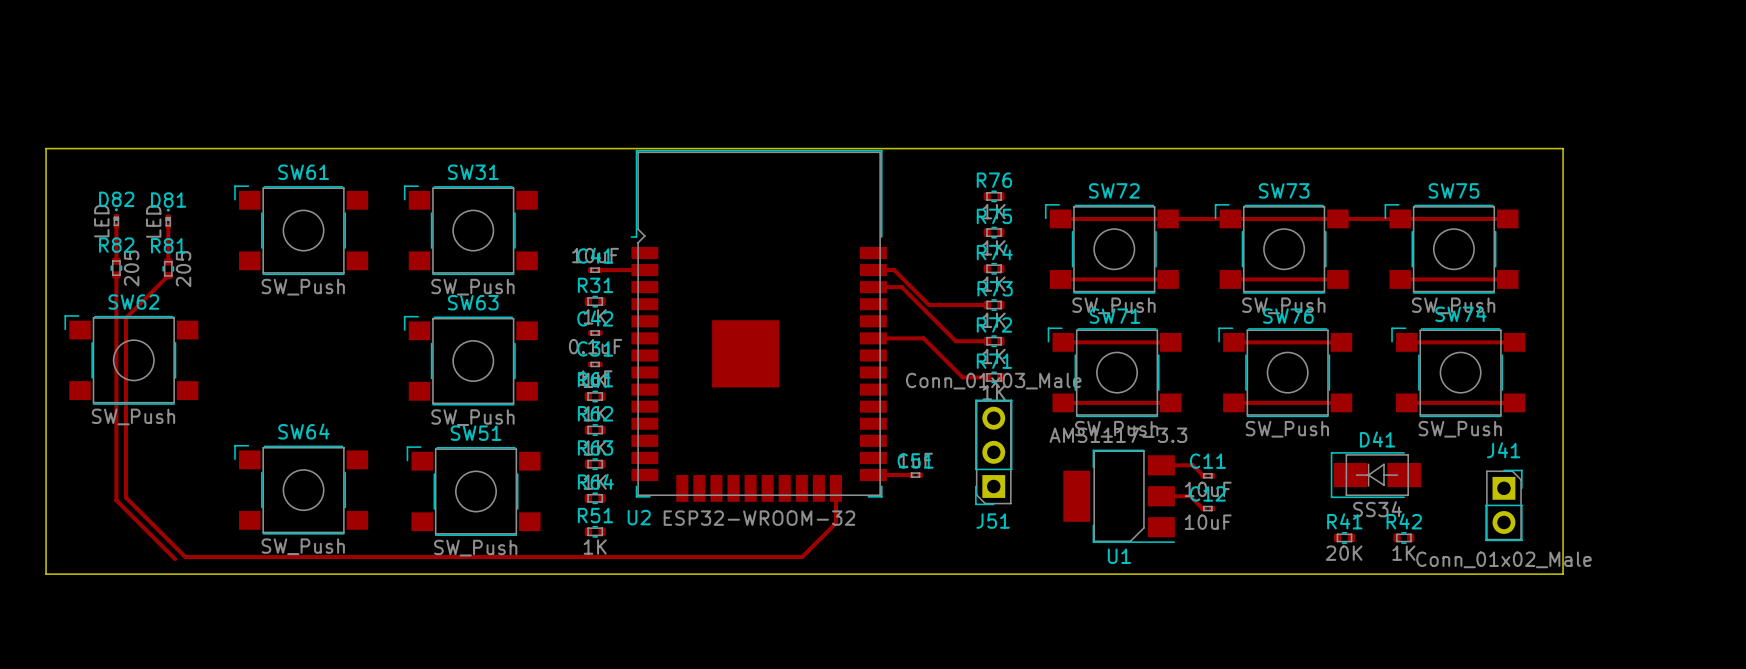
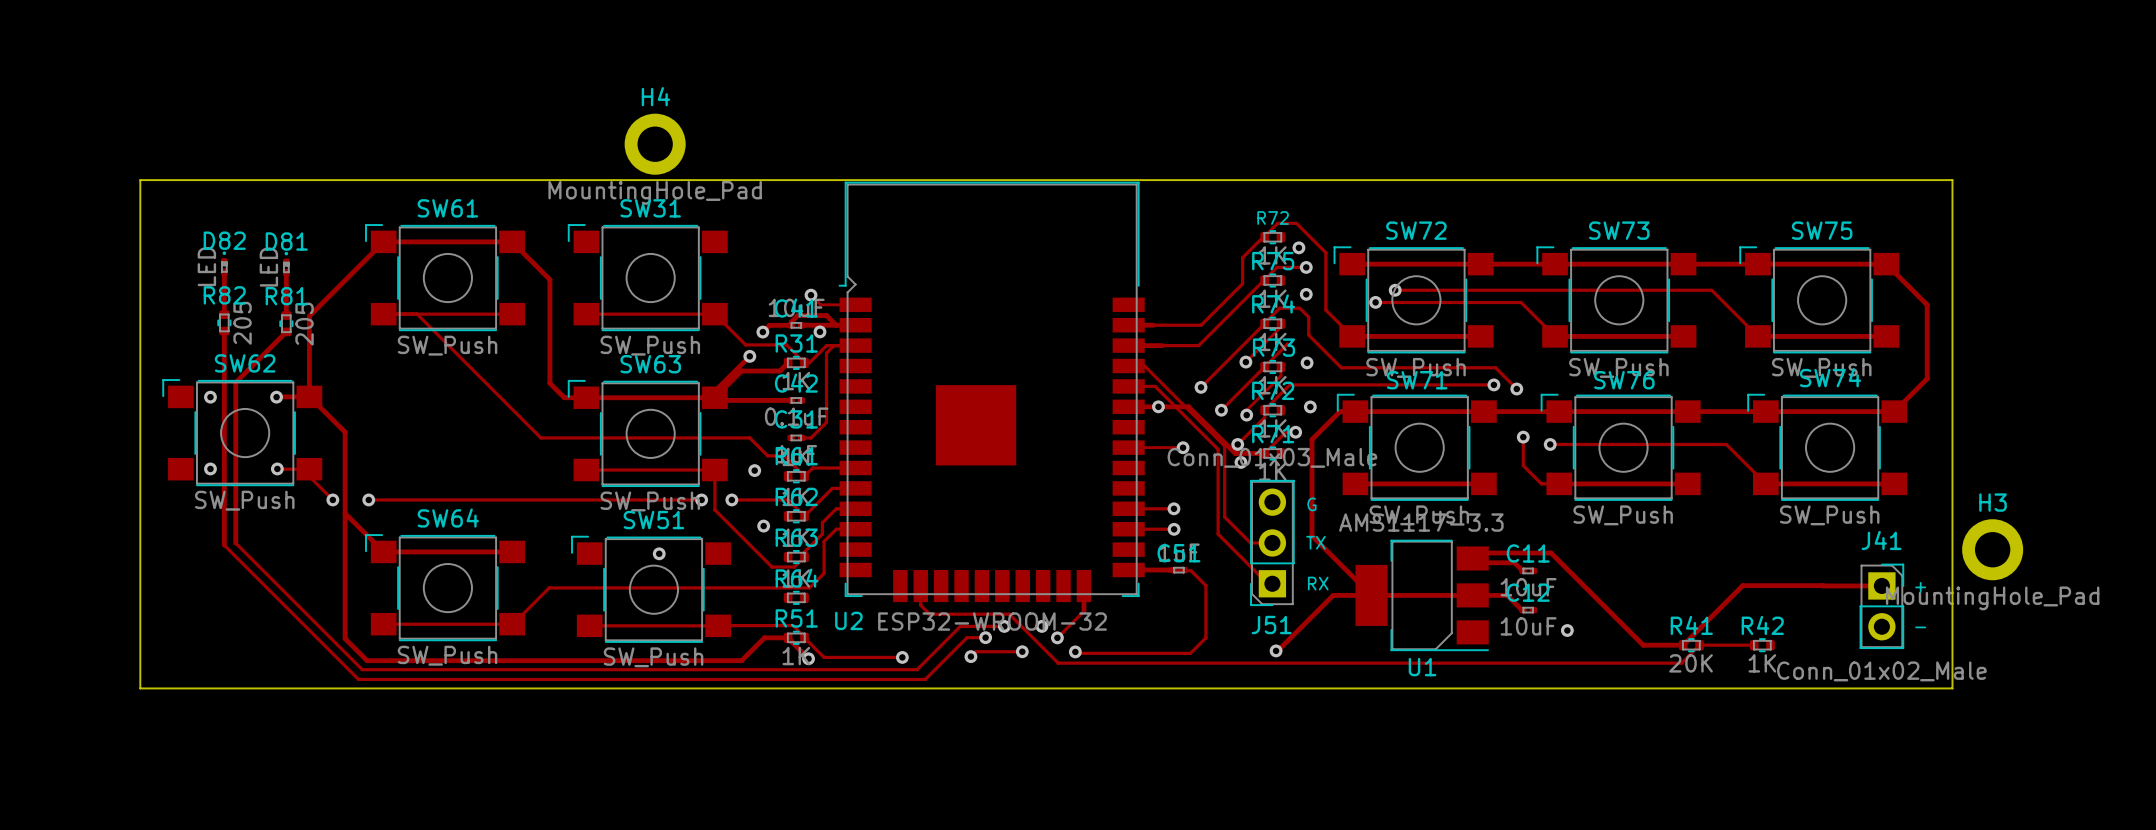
H4: none -> MountingHole_Pad (655, 144)
R76 name: R76 (994, 180) -> R72 (1273, 217)
via: none -> (1298, 247)
track: none -> (1886, 264) (1927, 304) (1927, 378) (1894, 411)
via: none -> (1306, 267)
track: none -> (1395, 290) (1711, 290) (1757, 336)
via: none -> (1395, 290)
track: none -> (810, 295) (820, 304) (855, 304)
via: none -> (810, 295)
via: none -> (1306, 294)
via: none -> (1375, 302)
track: none -> (1375, 302) (1521, 302) (1555, 336)
track: none -> (383, 314) (512, 314)
track: none -> (417, 314) (540, 437) (749, 437) (767, 455) (784, 455) (804, 476) (812, 468) (855, 468)
track: none -> (586, 314) (714, 314) (745, 344) (786, 344) (804, 362) (809, 362) (826, 345) (855, 345)
track: none -> (1264, 323) (1279, 308) (1299, 308) (1308, 317) (1308, 335) (1341, 367) (1495, 367) (1516, 388)
track: none -> (1264, 323) (1201, 387)
track: none -> (1281, 323) (1281, 326) (1245, 362)
track: none -> (836, 325) (826, 315) (797, 315) (791, 322) (791, 325) (769, 325) (762, 332)
track: (894, 270) (929, 305) (987, 305) -> (1153, 325) (1201, 325) (1242, 283) (1242, 257) (1277, 223) (1296, 223) (1325, 252) (1325, 310) (1352, 336)
via: none -> (762, 332)
via: none -> (819, 331)
track: none -> (1287, 344) (1221, 410)
track: none -> (833, 345) (826, 353) (826, 422) (810, 437) (801, 437)
track: (901, 287) (955, 341) (987, 341) -> (1162, 345) (1198, 345) (1276, 267) (1306, 267)
track: none -> (749, 356) (714, 391) (714, 397)
via: none -> (749, 356)
via: none -> (1245, 362)
track: none -> (788, 362) (779, 371) (741, 371) (714, 397)
via: none -> (1307, 362)
track: none -> (1141, 366) (1144, 366) (1224, 446) (1224, 517) (1250, 542) (1272, 542)
track: none -> (1281, 366) (1281, 375) (1246, 410) (1246, 415)
track: none -> (1493, 384) (1289, 384) (1264, 410) (1264, 417) (1237, 444)
via: none -> (1493, 384)
track: none -> (1128, 386) (1155, 386) (1218, 449) (1218, 534) (1267, 583) (1272, 583)
via: none -> (1201, 387)
via: none -> (1516, 388)
via: none -> (210, 397)
track: none -> (276, 397) (309, 396) (345, 432) (345, 638) (367, 660) (741, 660) (764, 637) (788, 637) (808, 658)
via: none -> (276, 397)
track: none -> (309, 396) (309, 316) (383, 241) (512, 241) (549, 279) (549, 383) (564, 397) (714, 397)
track: none -> (714, 397) (717, 400) (791, 400)
via: none -> (1158, 406)
via: none -> (1310, 406)
via: none -> (1221, 410)
track: none -> (1355, 411) (1339, 411) (1311, 439) (1311, 535) (1371, 595)
track: none -> (1483, 411) (1559, 411)
track: none -> (1687, 411) (1765, 411)
via: none -> (1246, 415)
track: none -> (1295, 432) (1285, 432) (1264, 453)
via: none -> (1295, 432)
track: none -> (1523, 437) (1523, 465) (1541, 483) (1559, 483)
via: none -> (1523, 437)
via: none -> (1237, 444)
track: none -> (1550, 444) (1726, 444) (1765, 483)
via: none -> (1550, 444)
track: none -> (1128, 447) (1182, 447)
via: none -> (1183, 447)
via: none -> (1240, 462)
via: none -> (210, 468)
track: none -> (277, 468) (309, 469) (309, 476) (332, 499)
via: none -> (277, 468)
track: none -> (586, 470) (714, 470) (714, 509) (772, 567) (794, 567) (804, 557) (804, 551) (822, 534) (822, 522) (836, 508) (855, 508)
via: none -> (754, 470)
track: none -> (855, 488) (832, 488) (804, 516) (788, 499) (731, 499)
via: none -> (332, 499)
track: none -> (368, 499) (701, 499)
via: none -> (368, 499)
via: none -> (701, 499)
via: none -> (731, 499)
text: none -> G (1311, 504)
track: none -> (1128, 508) (1173, 508)
via: none -> (1173, 508)
track: none -> (345, 513) (383, 551) (512, 551)
via: none -> (763, 526)
track: none -> (855, 529) (836, 529) (824, 541) (824, 573) (809, 587) (549, 587) (512, 624) (383, 624)
track: none -> (1128, 529) (1173, 529)
via: none -> (1174, 529)
track: (125, 452) (125, 497) (185, 557) (802, 557) (835, 523) (835, 509) -> (235, 543) (362, 669) (917, 669) (960, 626) (1004, 626)
text: none -> TX (1315, 542)
track: (116, 454) (116, 500) (175, 559) -> (224, 545) (358, 679) (925, 679) (967, 637) (985, 637)
H3: none -> MountingHole_Pad (1992, 549)
via: none -> (659, 553)
track: (1161, 465) (1192, 465) (1196, 468) -> (1881, 585) (1742, 585) (1683, 645) (1643, 645) (1551, 552) (1478, 552) (1472, 558) (1477, 562) (1514, 562)
track: none -> (1169, 570) (1190, 570) (1205, 585) (1205, 637) (1190, 653) (1075, 651)
D41: SS34 (1375, 475) -> none
text: none -> RX (1318, 583)
track: none -> (920, 586) (920, 605) (929, 614) (1009, 614) (1058, 663) (1681, 663) (1699, 645) (1754, 645)
text: none -> + (1920, 587)
track: none -> (1472, 595) (1333, 595) (1276, 650)
track: none -> (1083, 611) (1057, 637)
track: none -> (589, 625) (793, 625) (804, 637)
via: none -> (1004, 626)
via: none -> (1041, 626)
text: none -> - (1920, 627)
via: none -> (1567, 630)
track: none -> (804, 637) (824, 657) (902, 657)
via: none -> (985, 637)
via: none -> (1057, 637)
via: none -> (1276, 650)
track: none -> (1022, 651) (975, 651) (970, 656)
via: none -> (1022, 651)
via: none -> (1075, 651)
via: none -> (970, 656)
via: none -> (902, 657)
via: none -> (808, 658)

